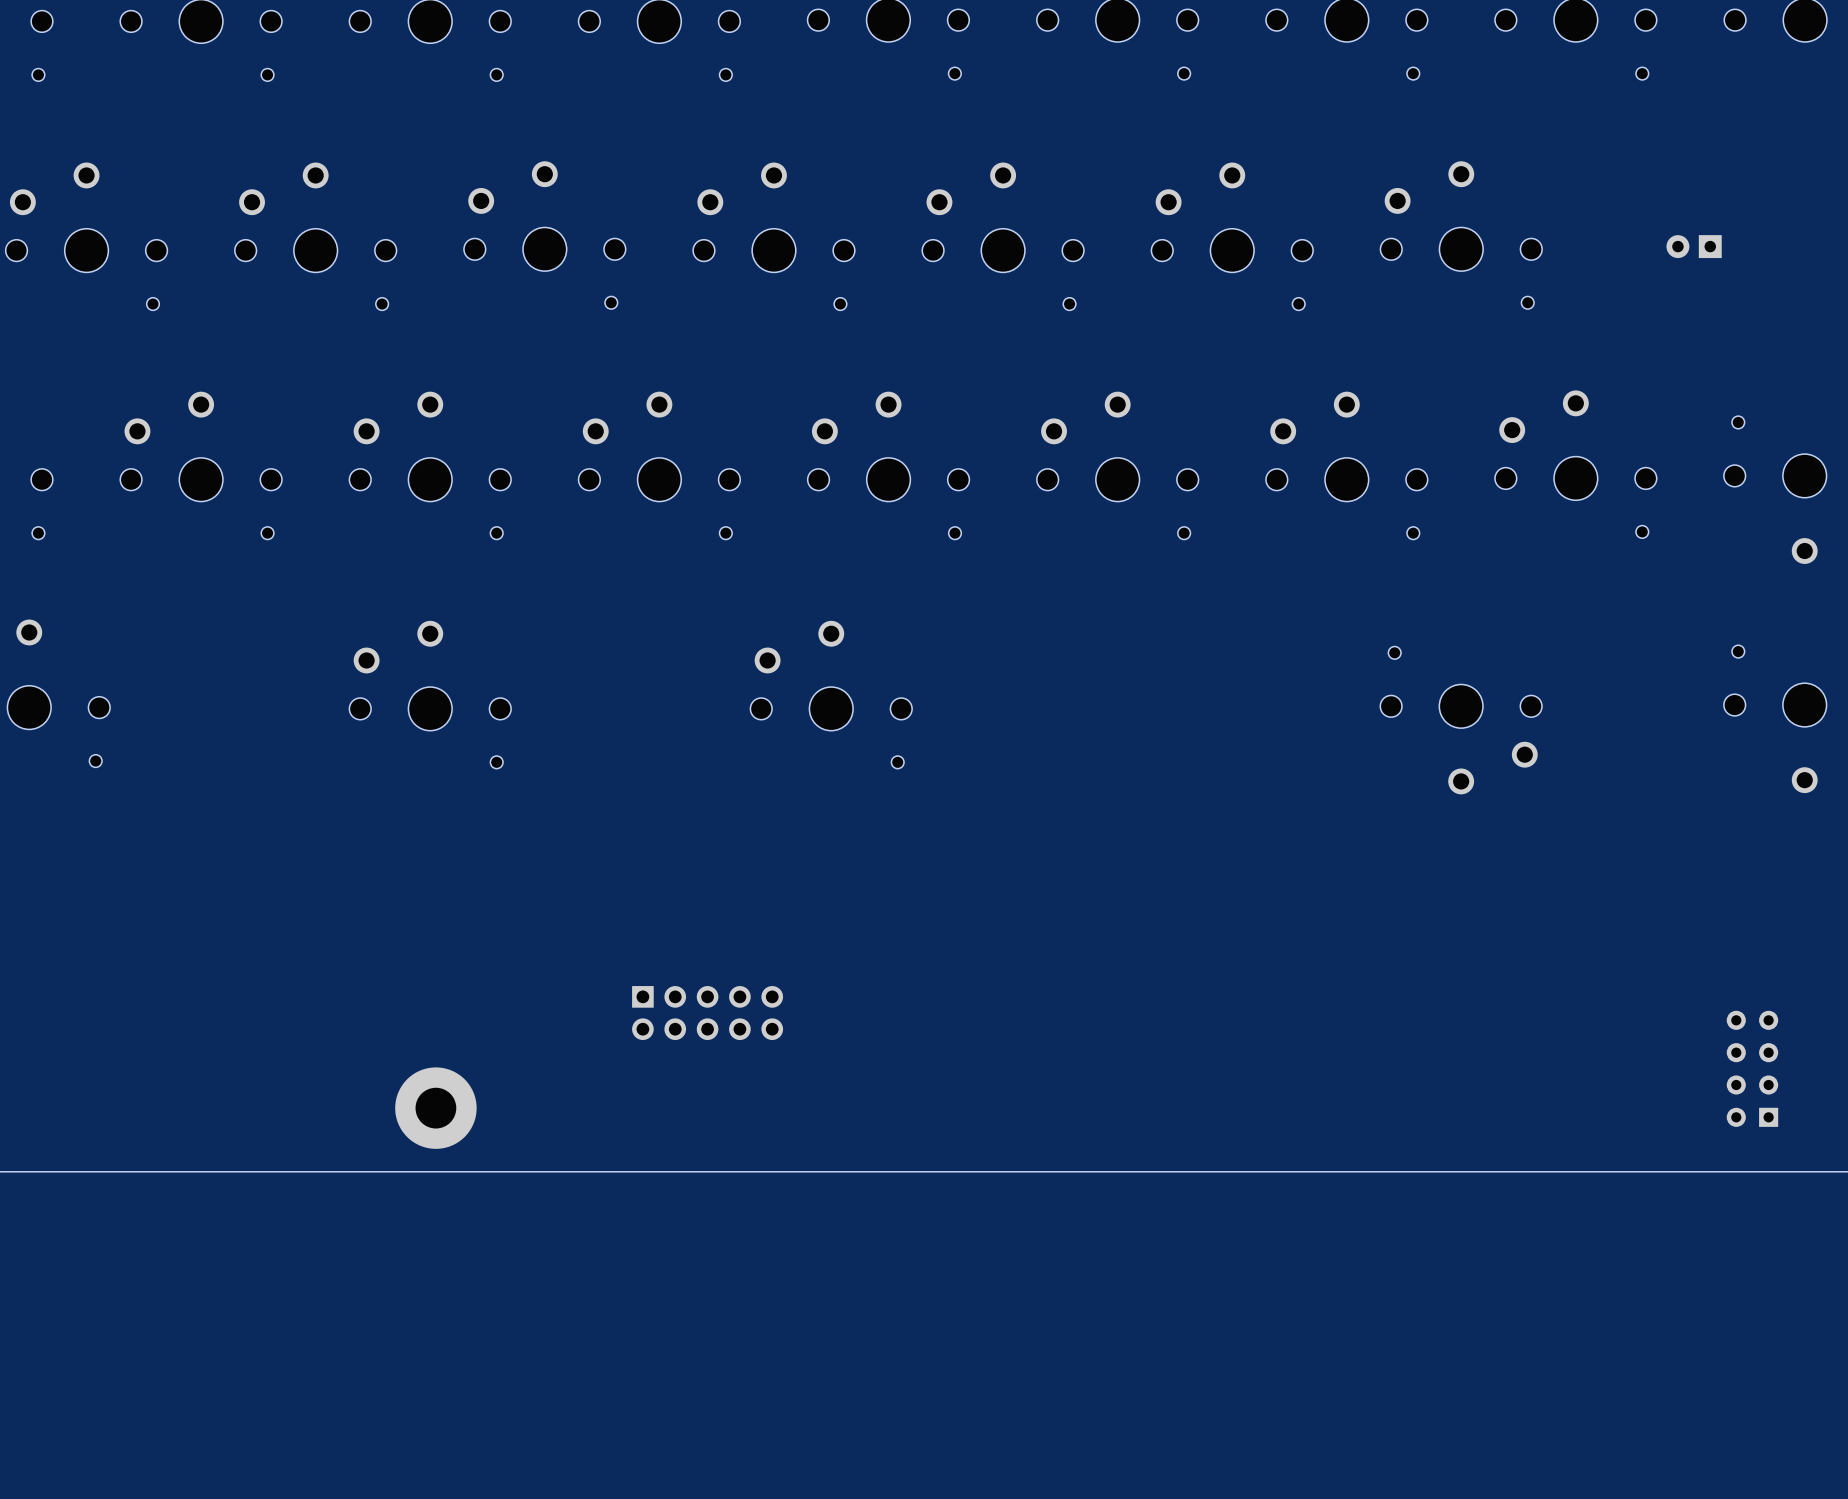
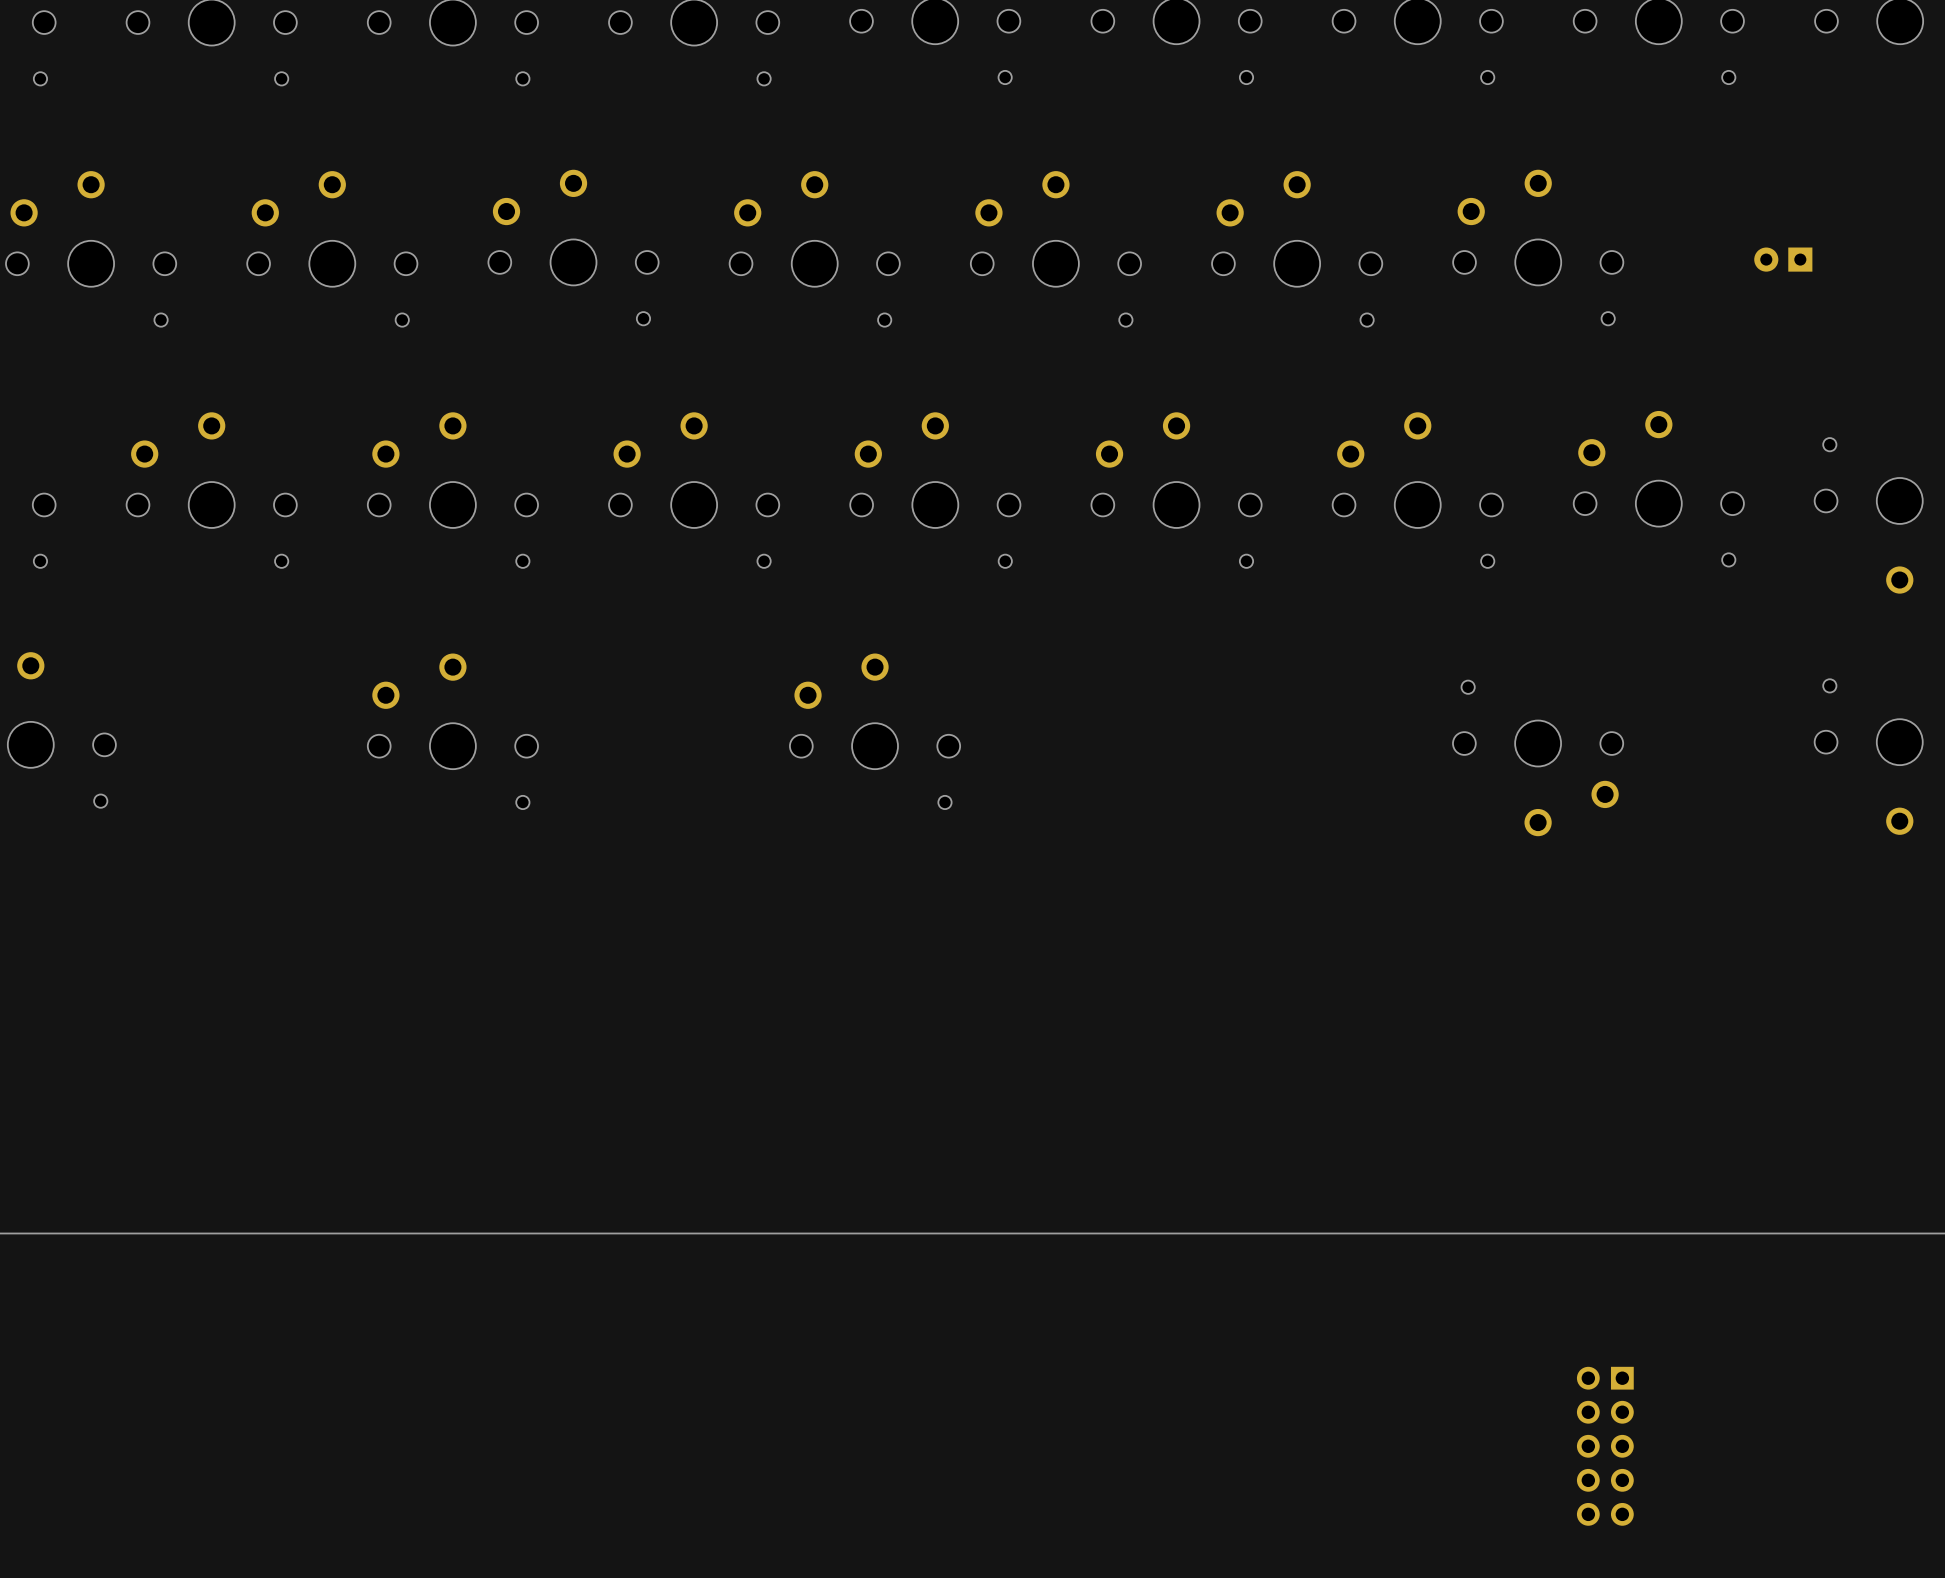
part: (707, 1013) -> none
part: (1752, 1068) -> none
part: (435, 1108) -> none
part: none -> (1605, 1446)

